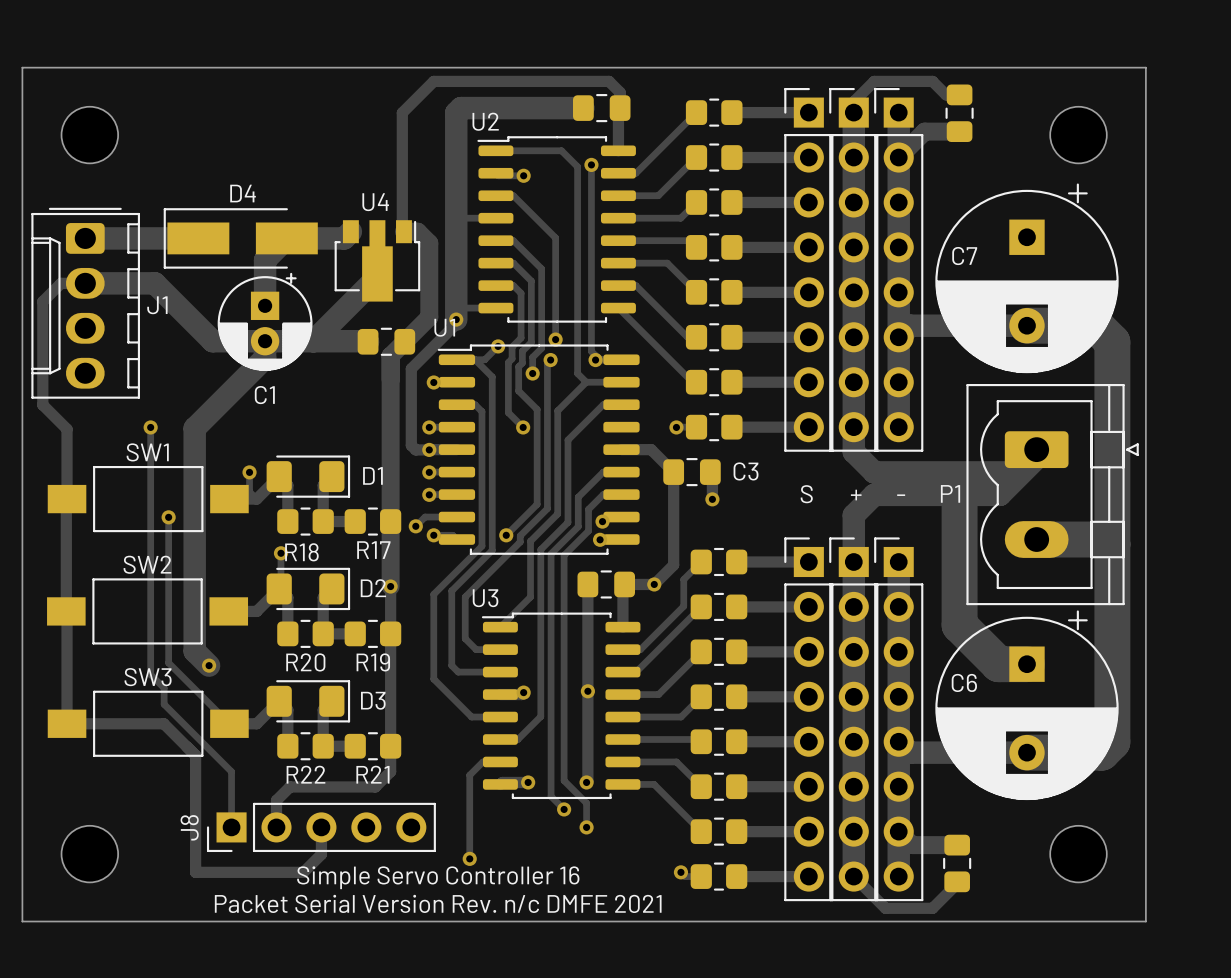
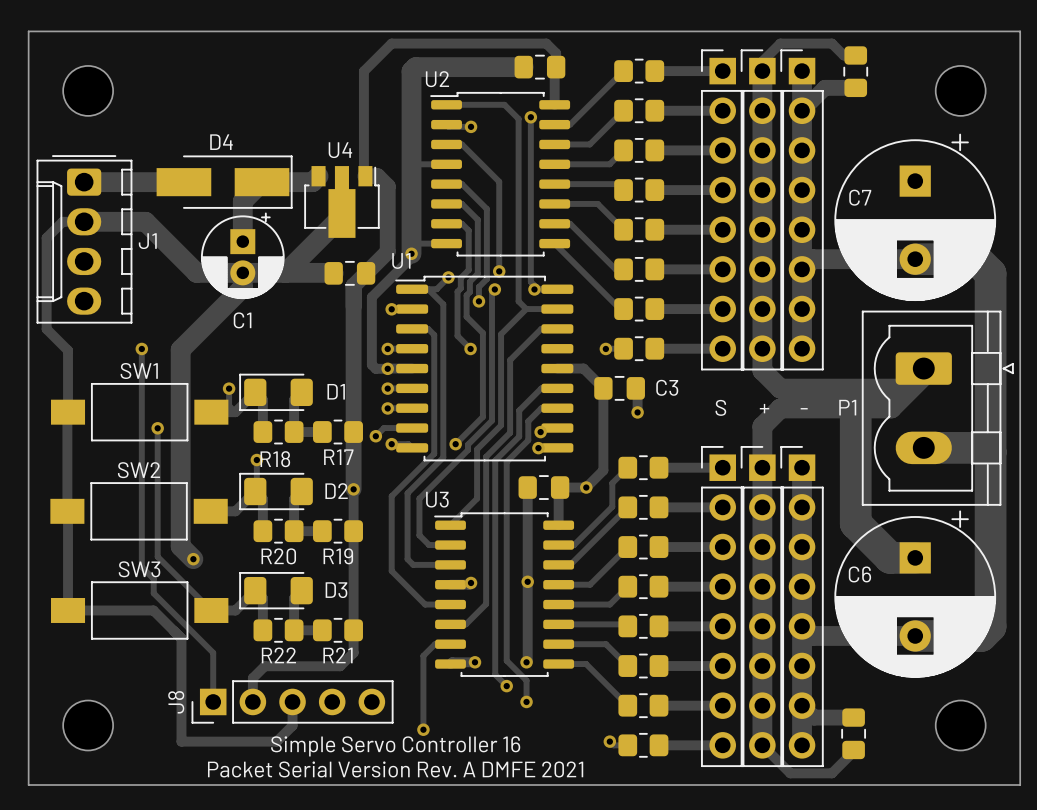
D4 rotation: 0° (240, 238) -> 180° (224, 182)
D1 rotation: 0° (308, 476) -> 180° (276, 392)
D2 rotation: 0° (308, 588) -> 180° (276, 491)
D3 rotation: 0° (308, 701) -> 180° (276, 590)
text: Packet Serial Version Rev. n/c DMFE 2021 (438, 903) -> Packet Serial Version Rev. A DMFE 2021 (395, 769)

